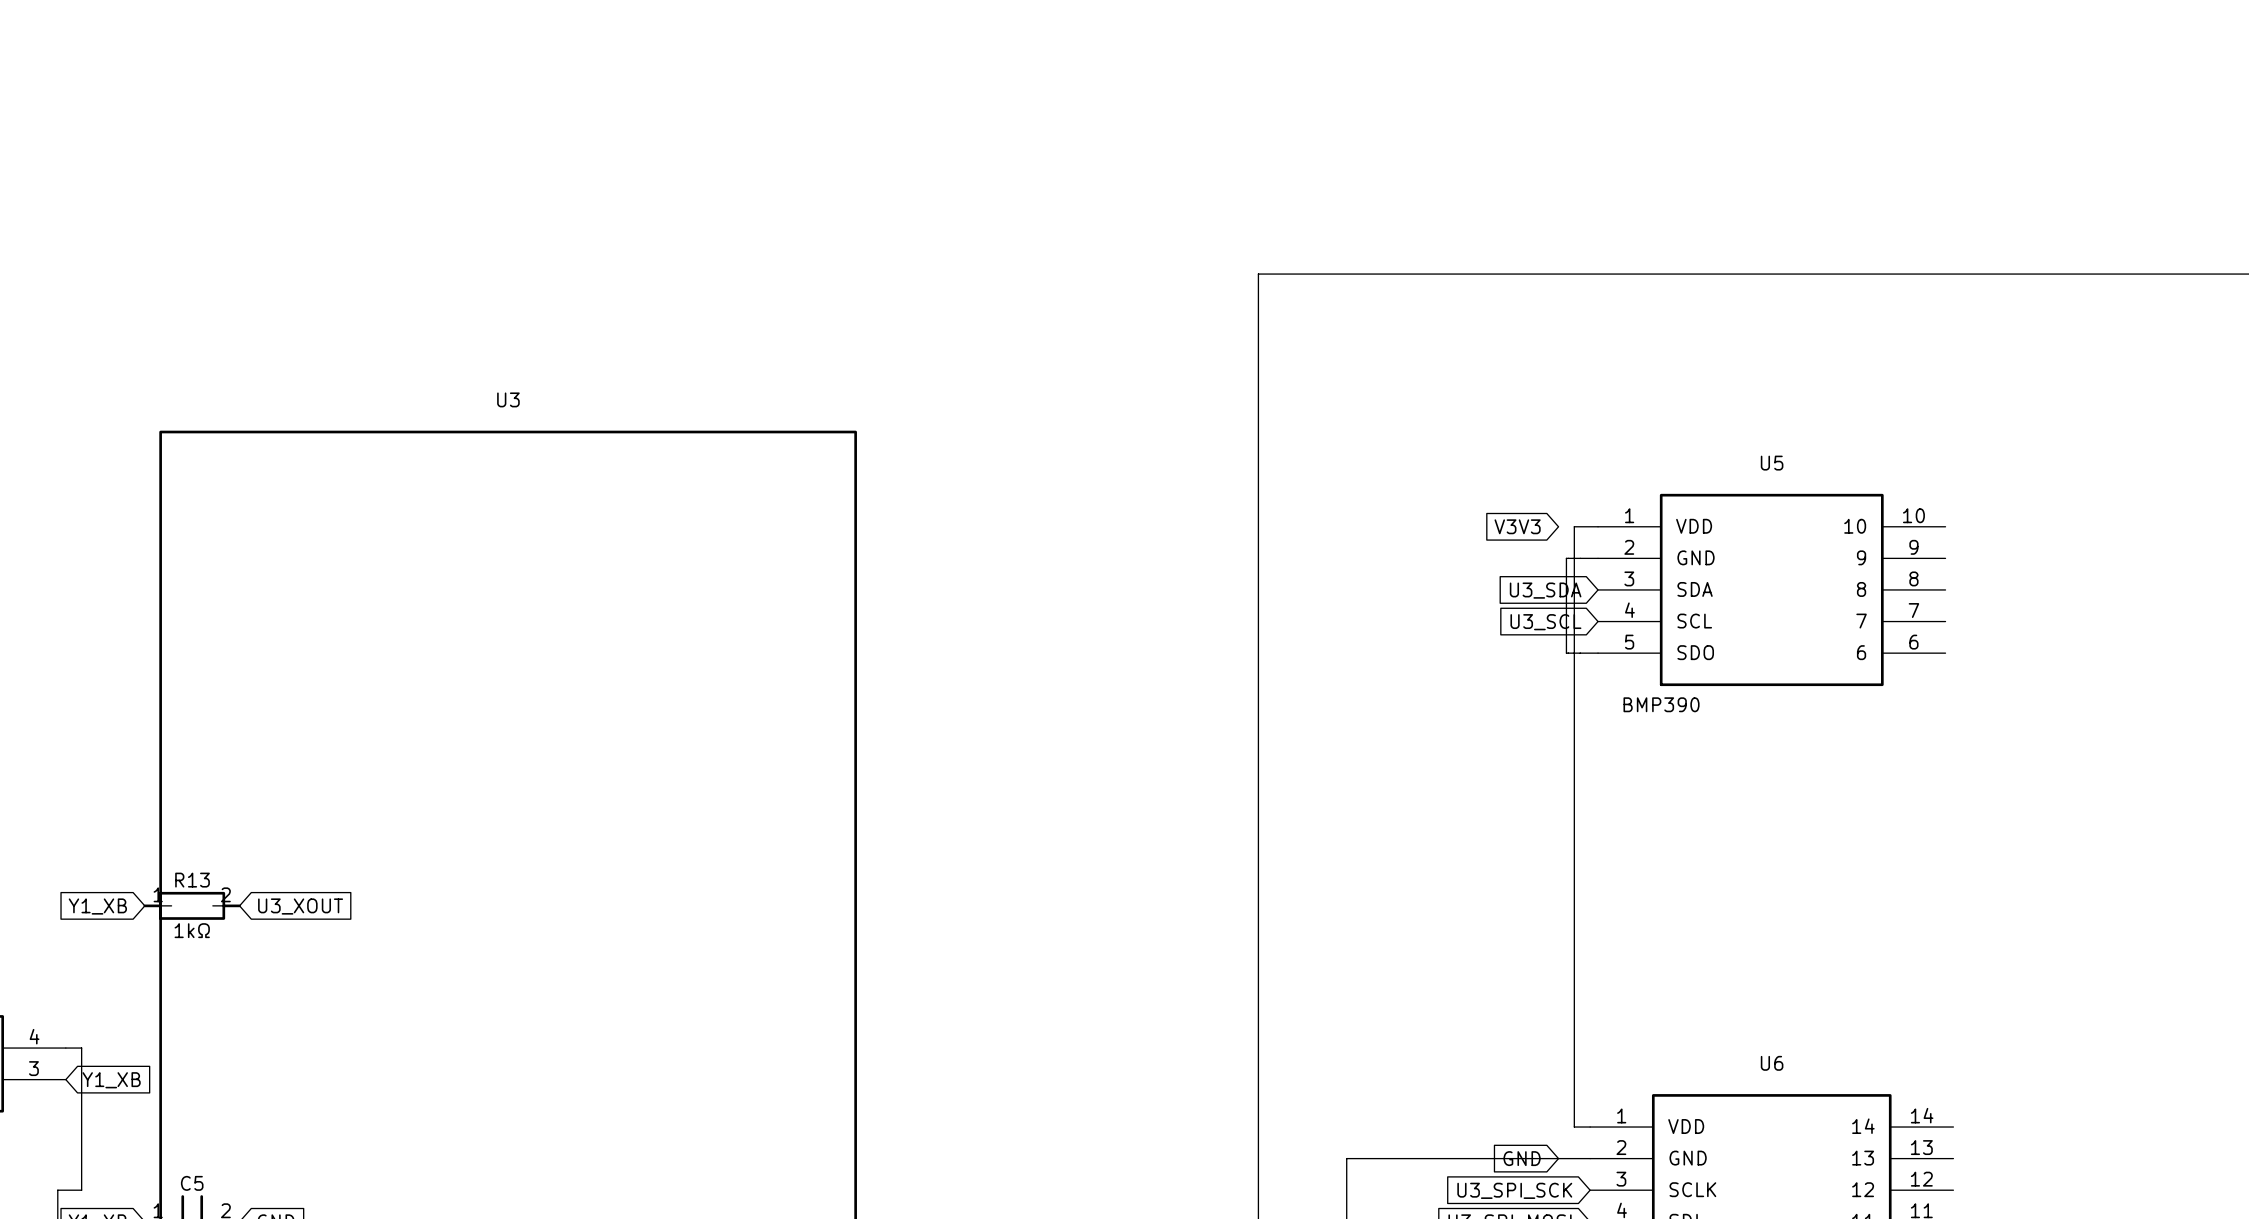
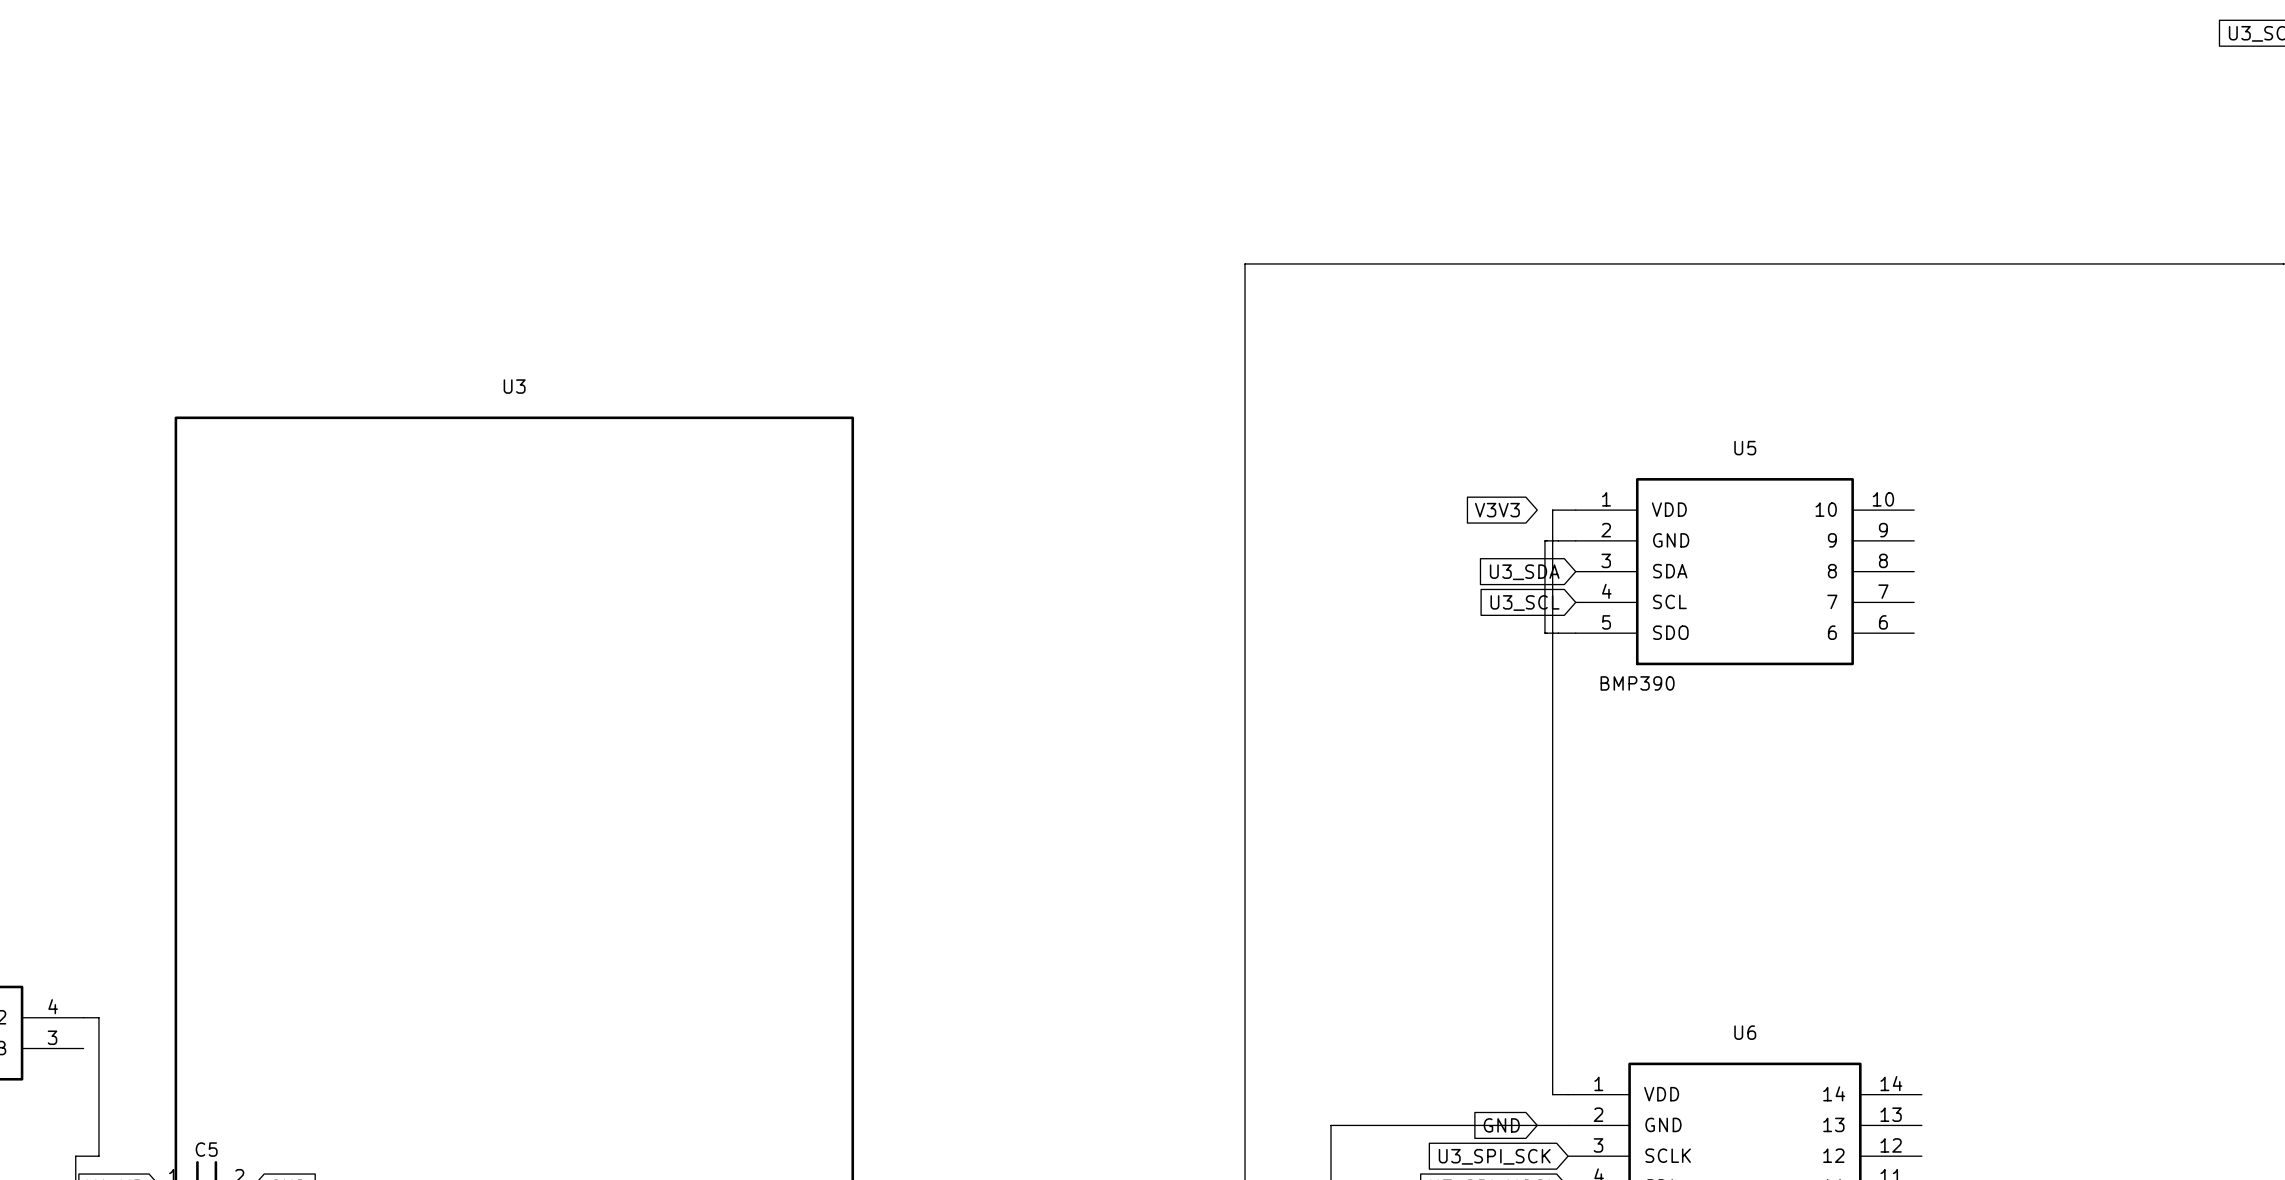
R13: 1kΩ (192, 905) -> none
global label: Y1_XB (97, 906) -> none
global label: U3_XOUT (300, 906) -> none
global label: Y1_XB (111, 1080) -> none

